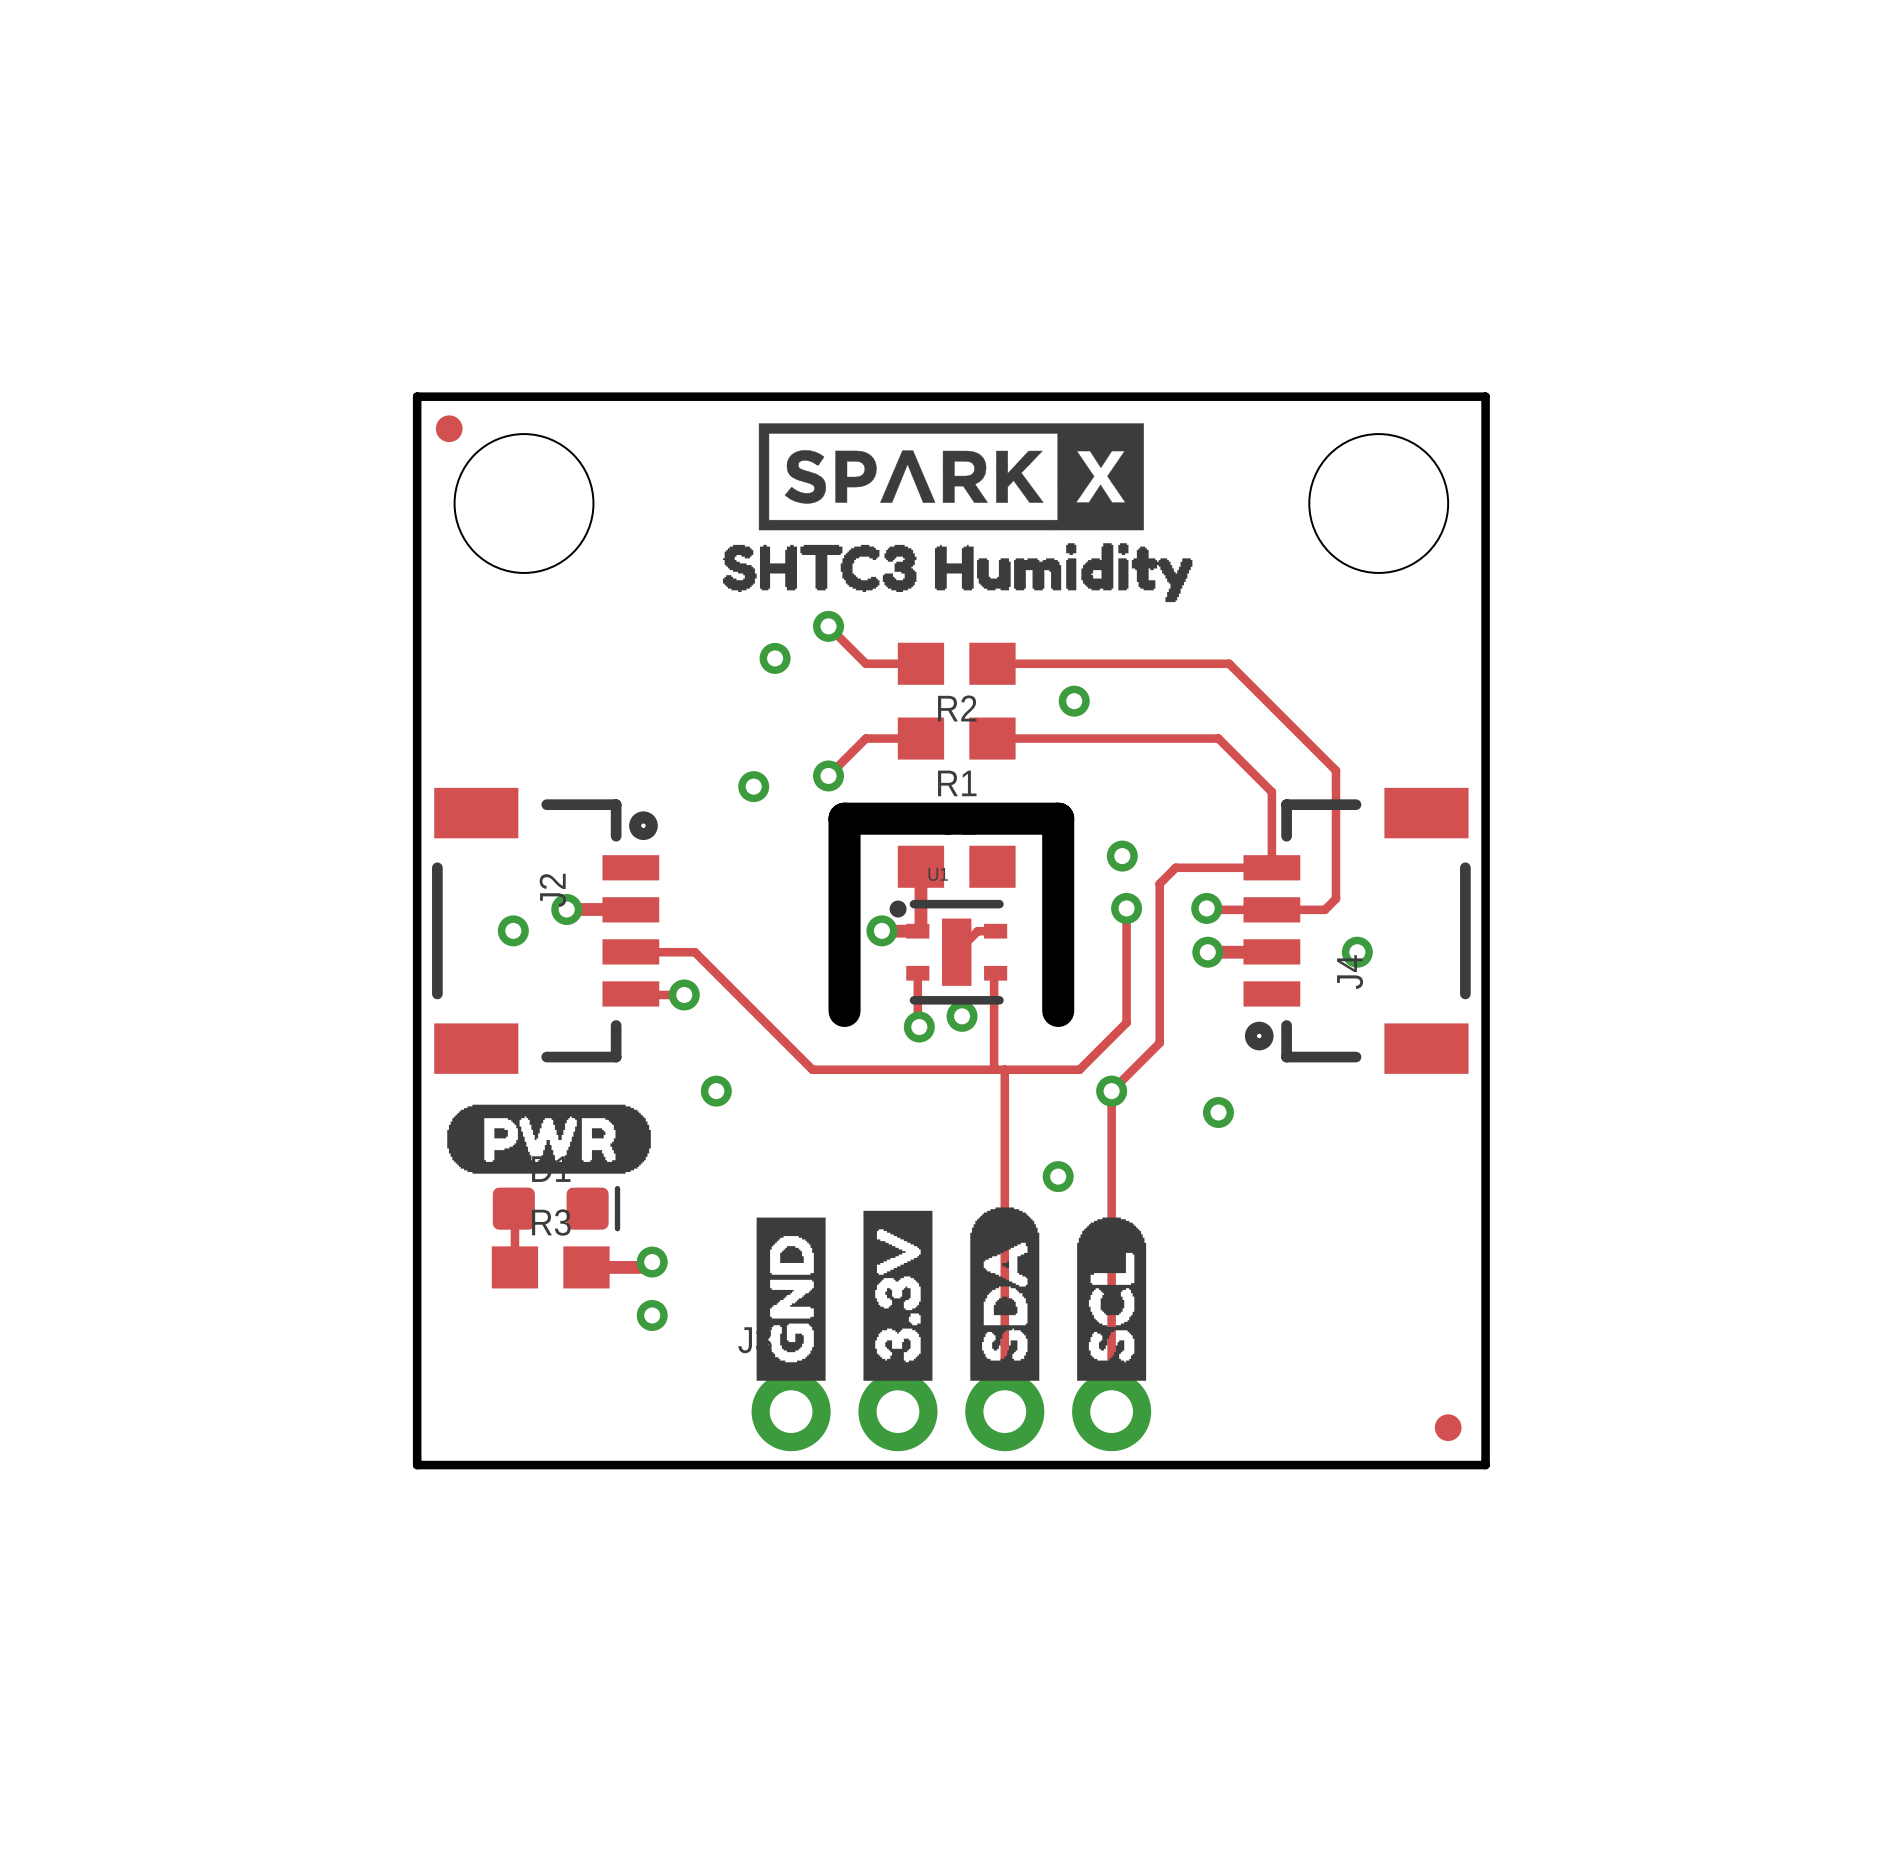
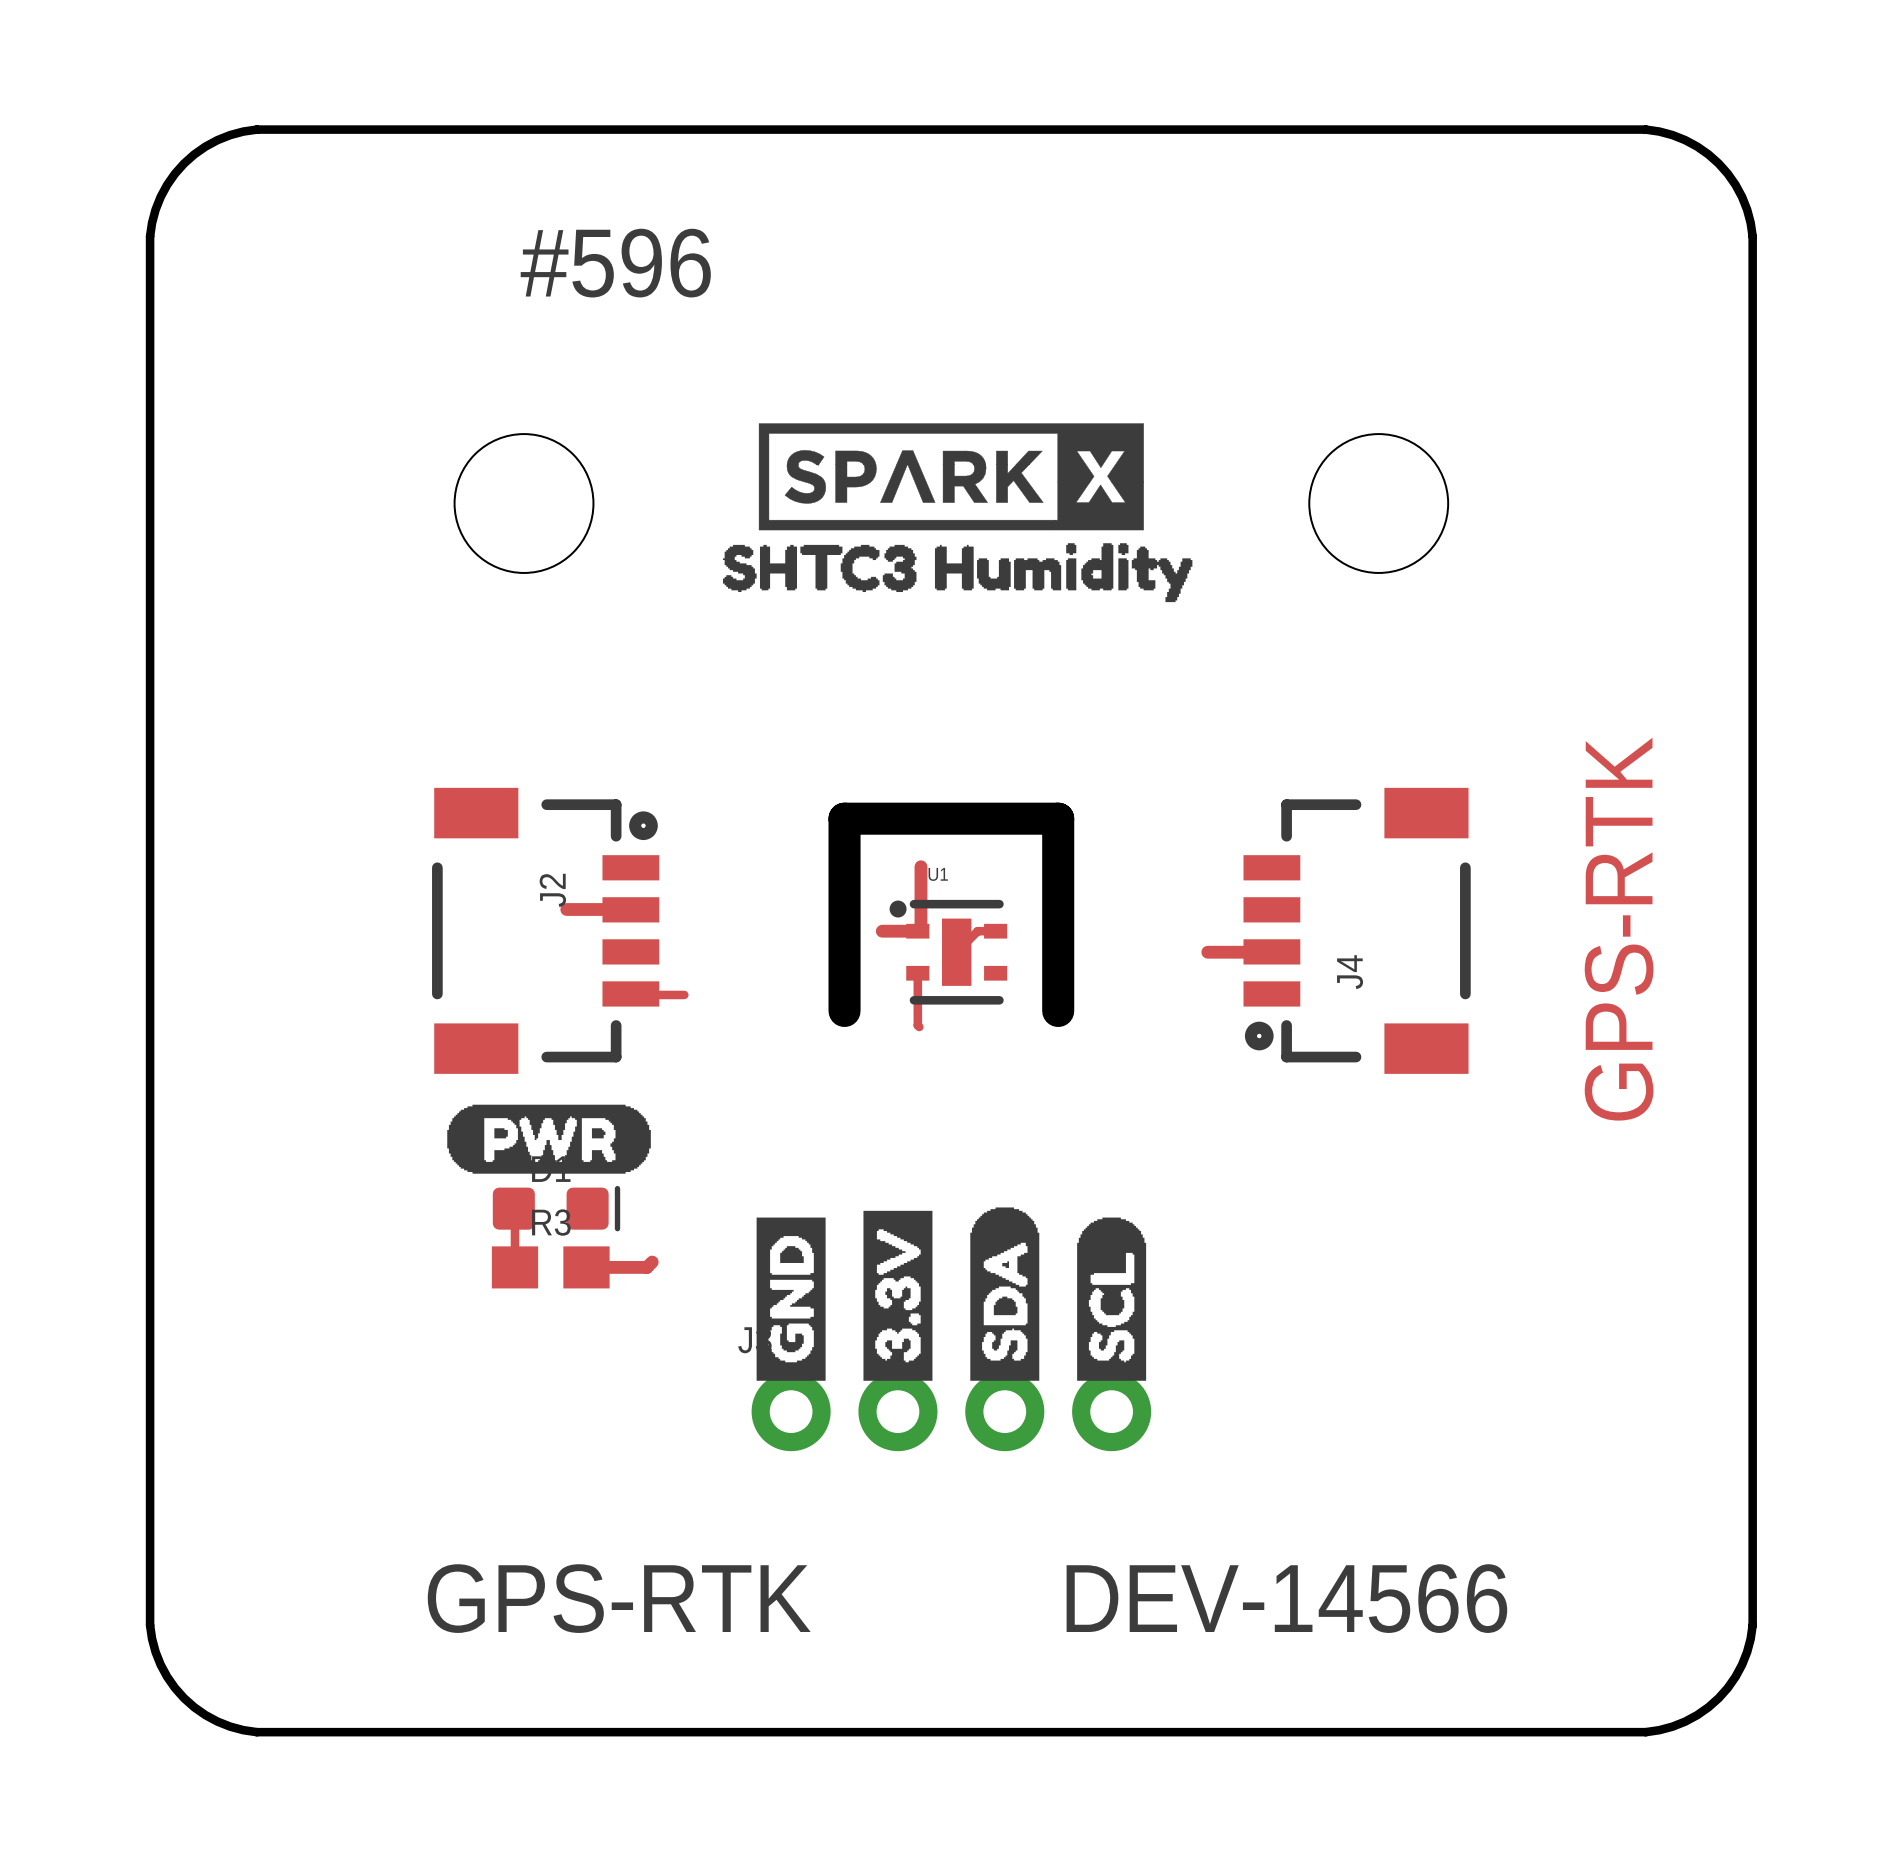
board edge: none -> (256, 129) (1645, 129) (1672, 135) (1685, 140) (1708, 154) (1718, 163) (1727, 173) (1742, 196) (1747, 209) (1752, 236) (1752, 1625) (1747, 1652) (1742, 1664) (1727, 1687) (1718, 1698) (1708, 1707) (1685, 1721) (1672, 1726) (1645, 1732) (256, 1732) (230, 1726) (217, 1721) (194, 1707) (184, 1698) (174, 1687) (160, 1664) (155, 1652) (150, 1625) (150, 236) (155, 209) (160, 196) (174, 173) (184, 163) (194, 154) (217, 140) (230, 135) (256, 129)
text: none -> #596 (615, 263)
board edge: (417, 396) (417, 1465) (1485, 1465) (1485, 396) (417, 396) -> none
part: (449, 428) -> none
track: (828, 626) (865, 663) (920, 663) -> none
via: (828, 626) -> none
via: (775, 658) -> none
R2: (956, 663) -> none
track: (992, 663) (1229, 663) (1335, 770) (1335, 898) (1324, 909) (1206, 908) -> none
via: (1074, 701) -> none
track: (920, 738) (865, 738) (828, 775) -> none
R1: (956, 738) -> none
track: (992, 738) (1218, 738) (1271, 791) (1271, 867) (1175, 867) (1159, 883) (1159, 1043) (1111, 1091) (1111, 1411) -> none
via: (828, 775) -> none
via: (753, 786) -> none
via: (1122, 856) -> none
part: (956, 866) -> none
track: (1126, 908) (1126, 1022) (1079, 1069) (812, 1069) (694, 952) (631, 952) -> none
via: (1126, 908) -> none
via: (1206, 908) -> none
via: (566, 909) -> none
text: none -> GPS-RTK (1619, 929)
via: (513, 930) -> none
via: (881, 930) -> none
via: (1207, 952) -> none
via: (1357, 952) -> none
track: (995, 973) (994, 1069) -> none
via: (684, 994) -> none
via: (962, 1016) -> none
via: (919, 1027) -> none
track: (1004, 1069) (1004, 1411) -> none
via: (716, 1091) -> none
via: (1111, 1091) -> none
via: (1218, 1112) -> none
via: (1058, 1176) -> none
via: (652, 1262) -> none
via: (652, 1315) -> none
part: (1448, 1427) -> none
text: none -> GPS-RTK (619, 1598)
text: none -> DEV-14566 (1286, 1598)

